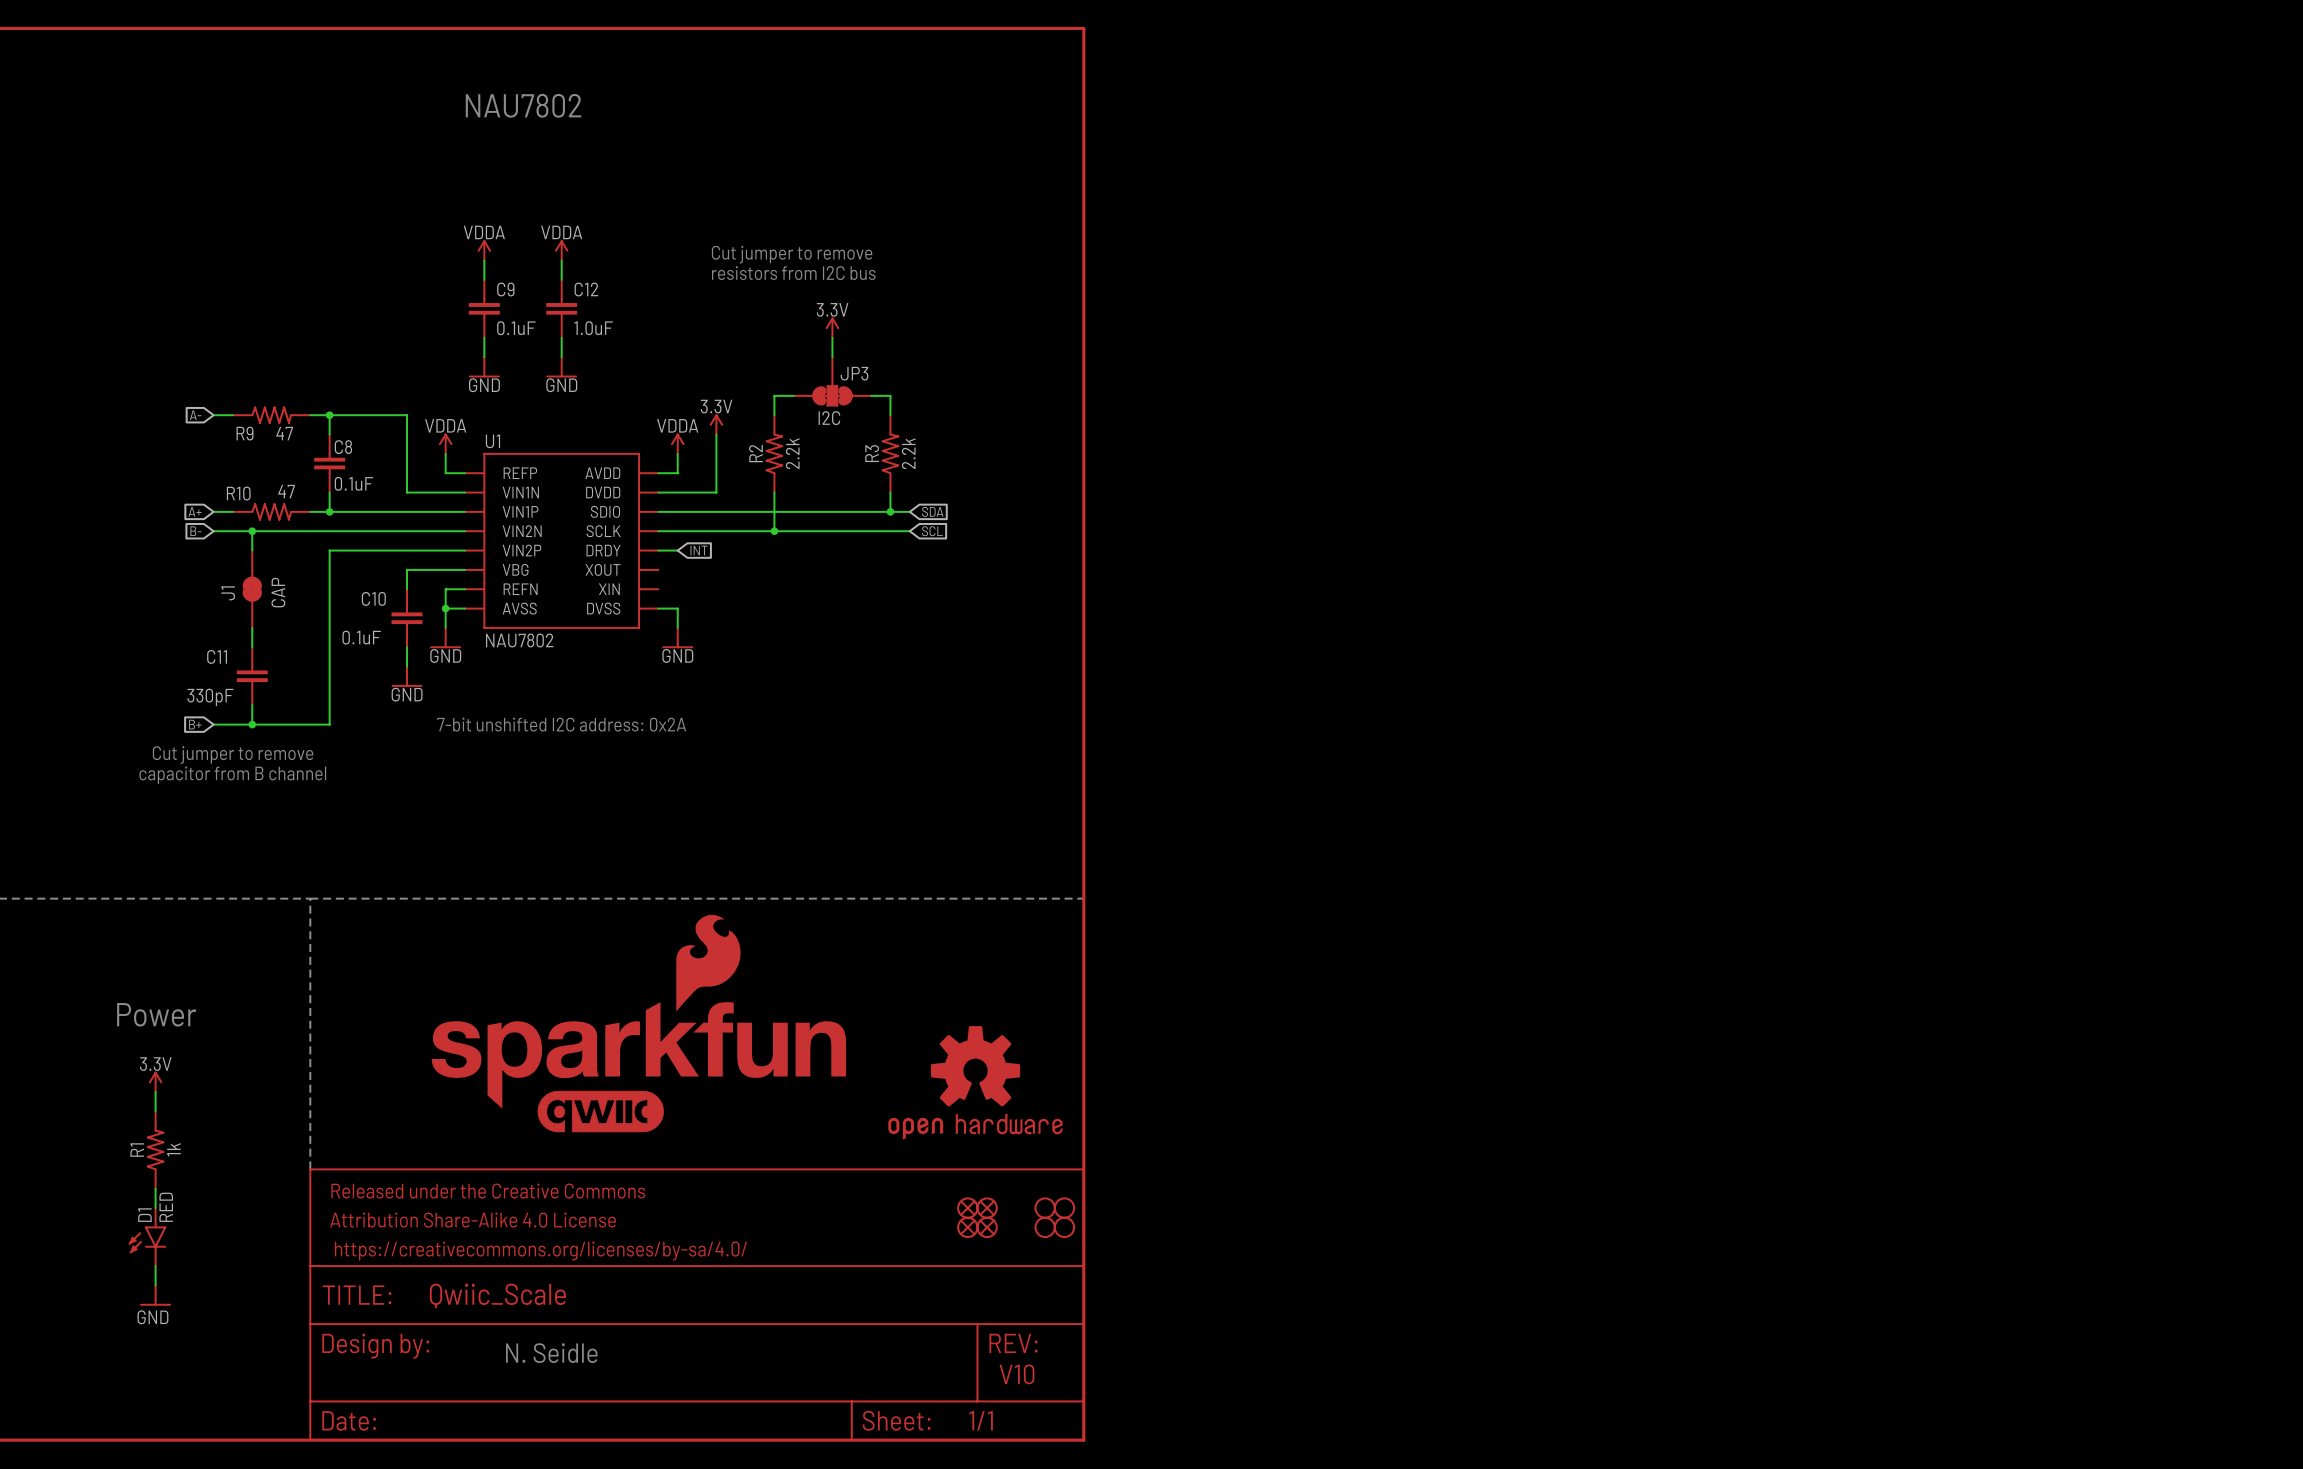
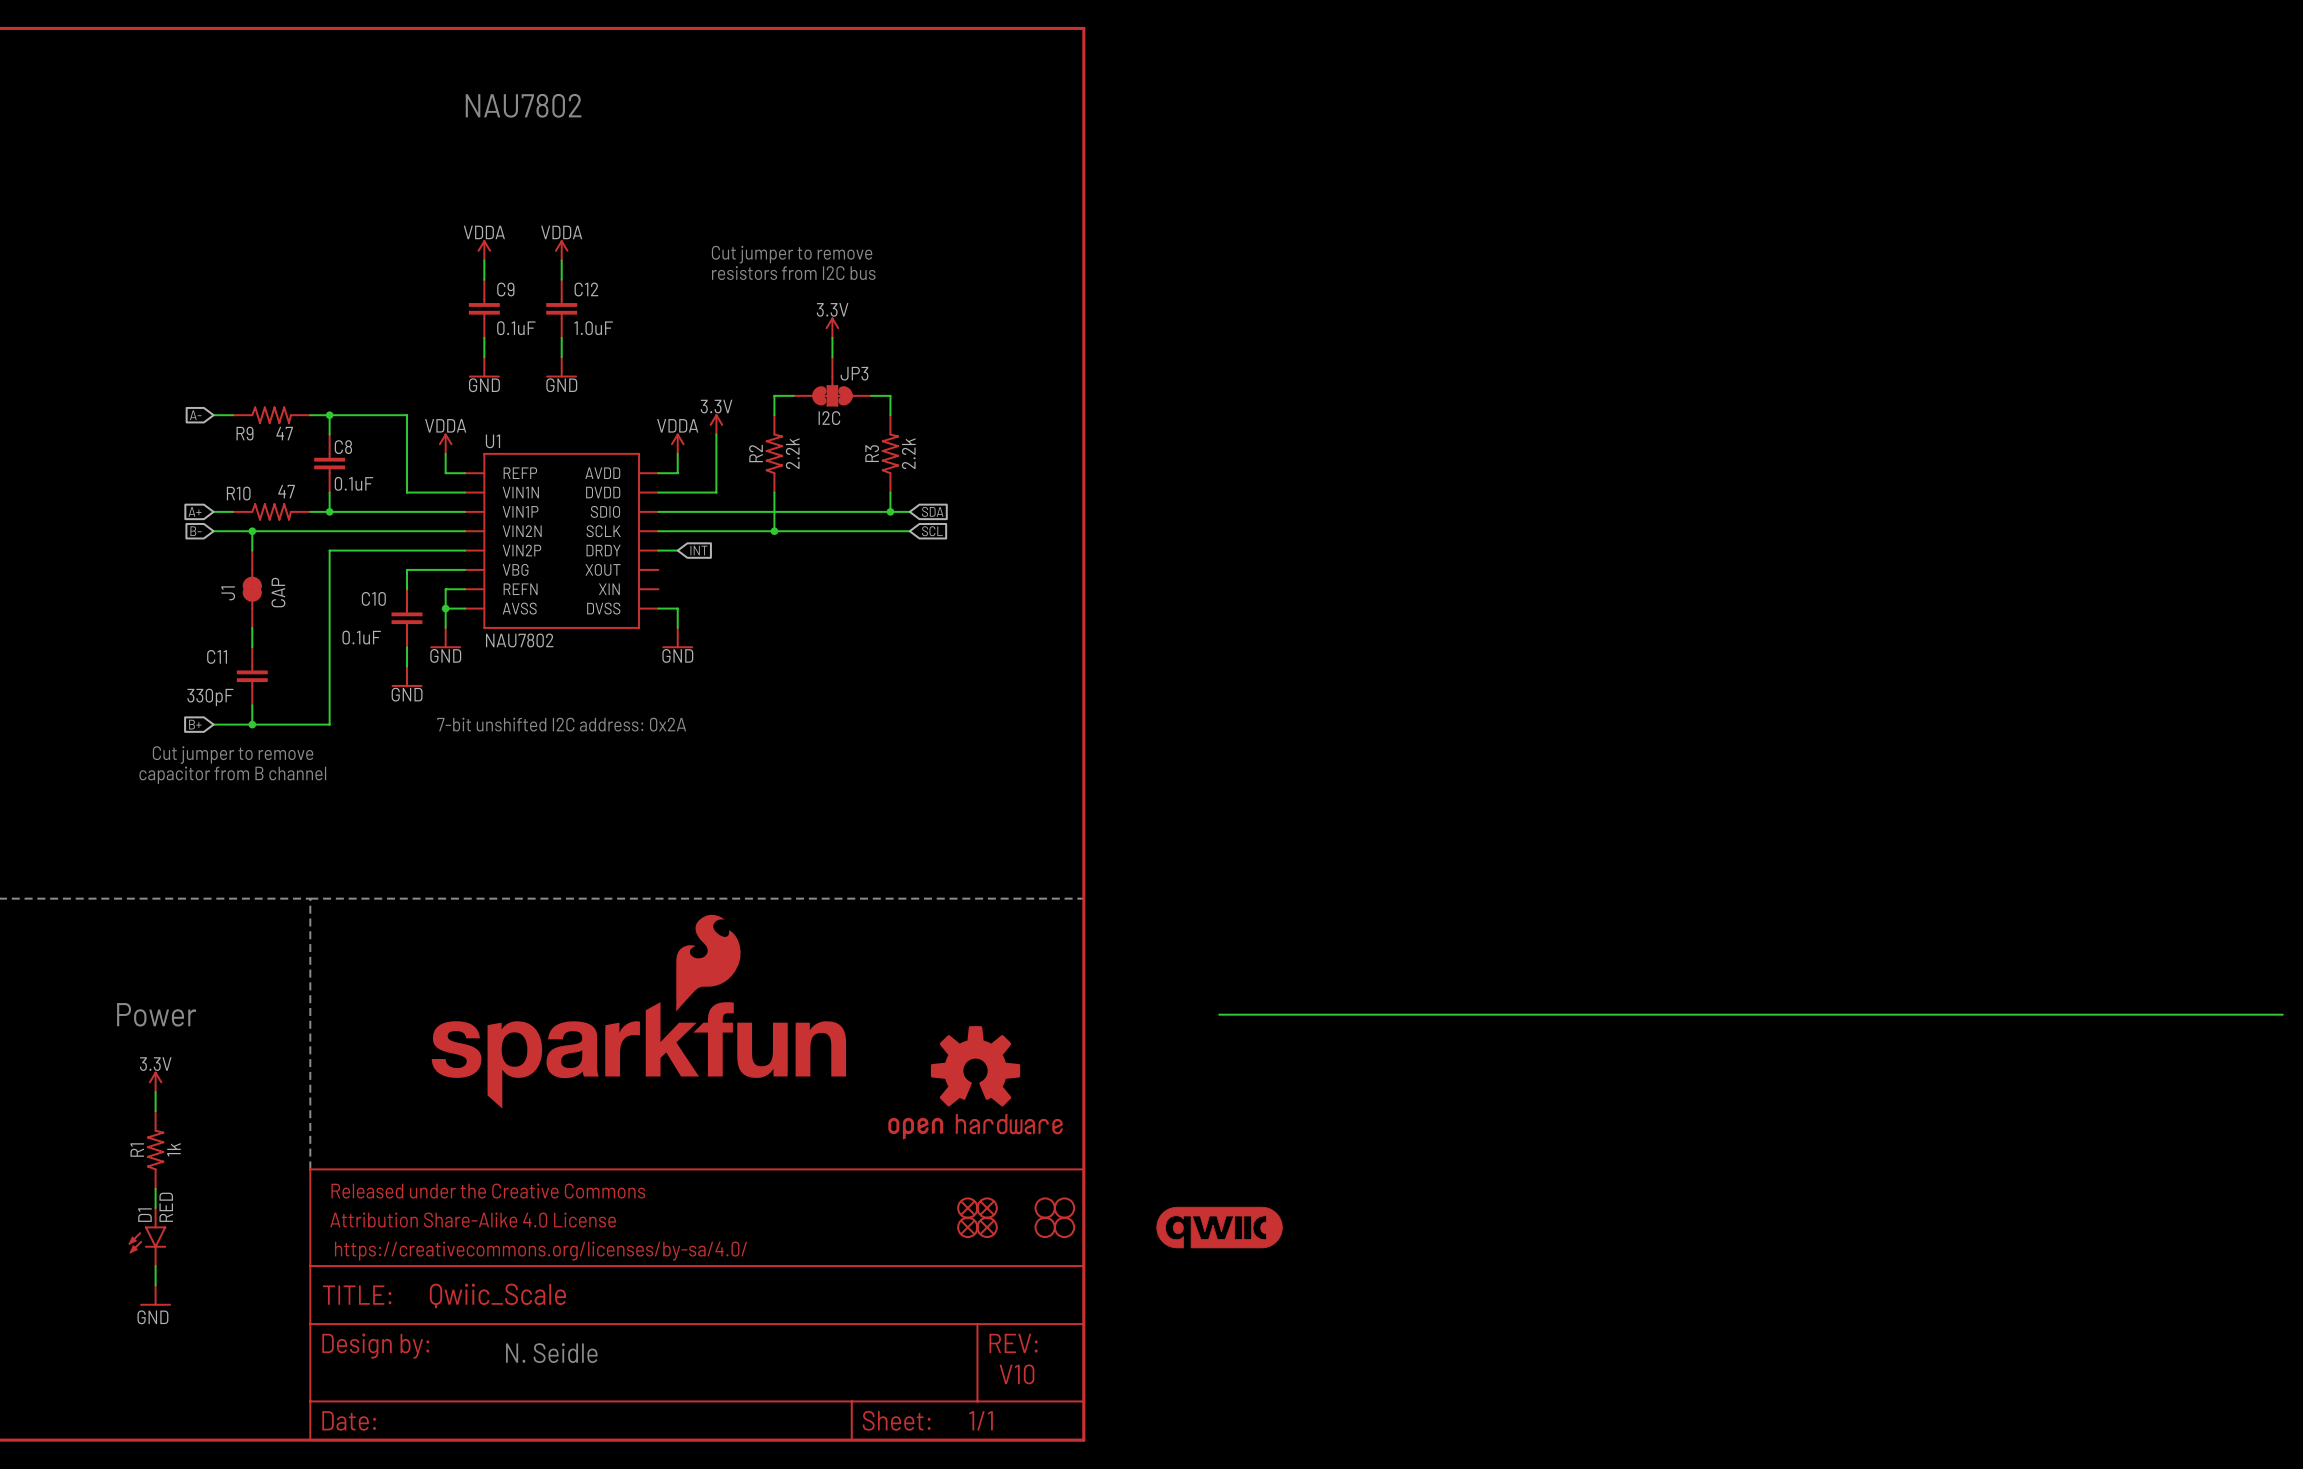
wire: none -> (1219, 1014) (2282, 1014)
part: (600, 1111) -> none
part: none -> (1219, 1227)

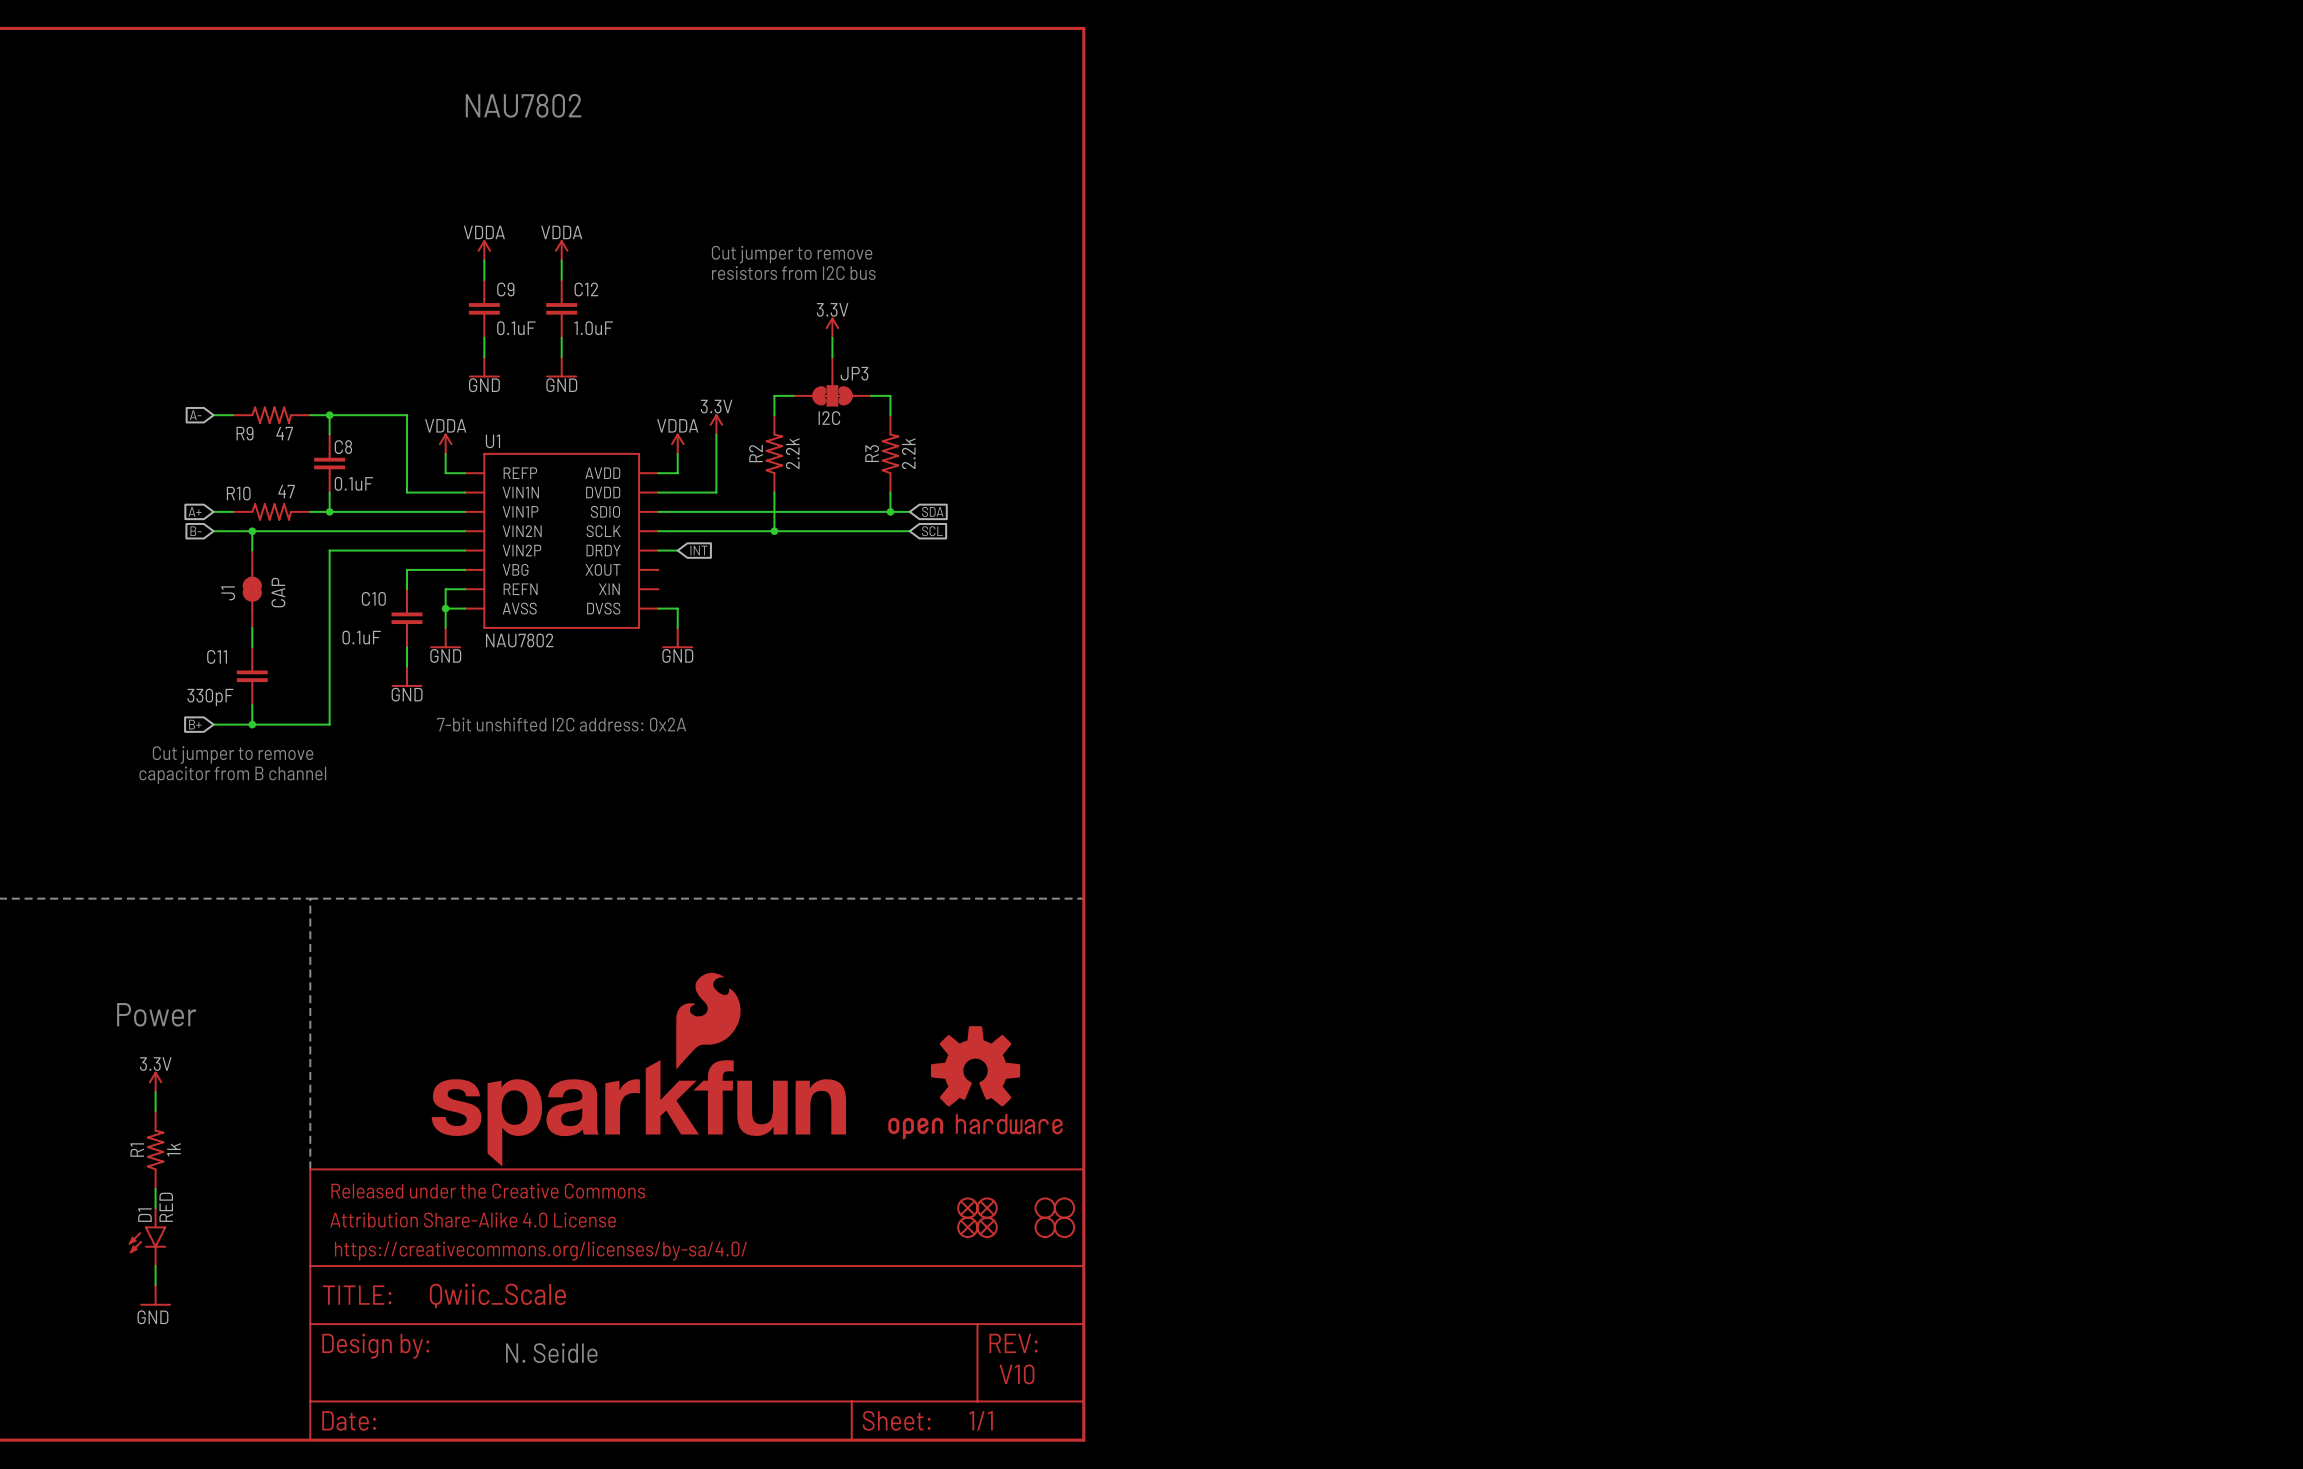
part position: (638, 1011) -> (638, 1069)
wire: (1219, 1014) (2282, 1014) -> none
part: (1219, 1227) -> none

